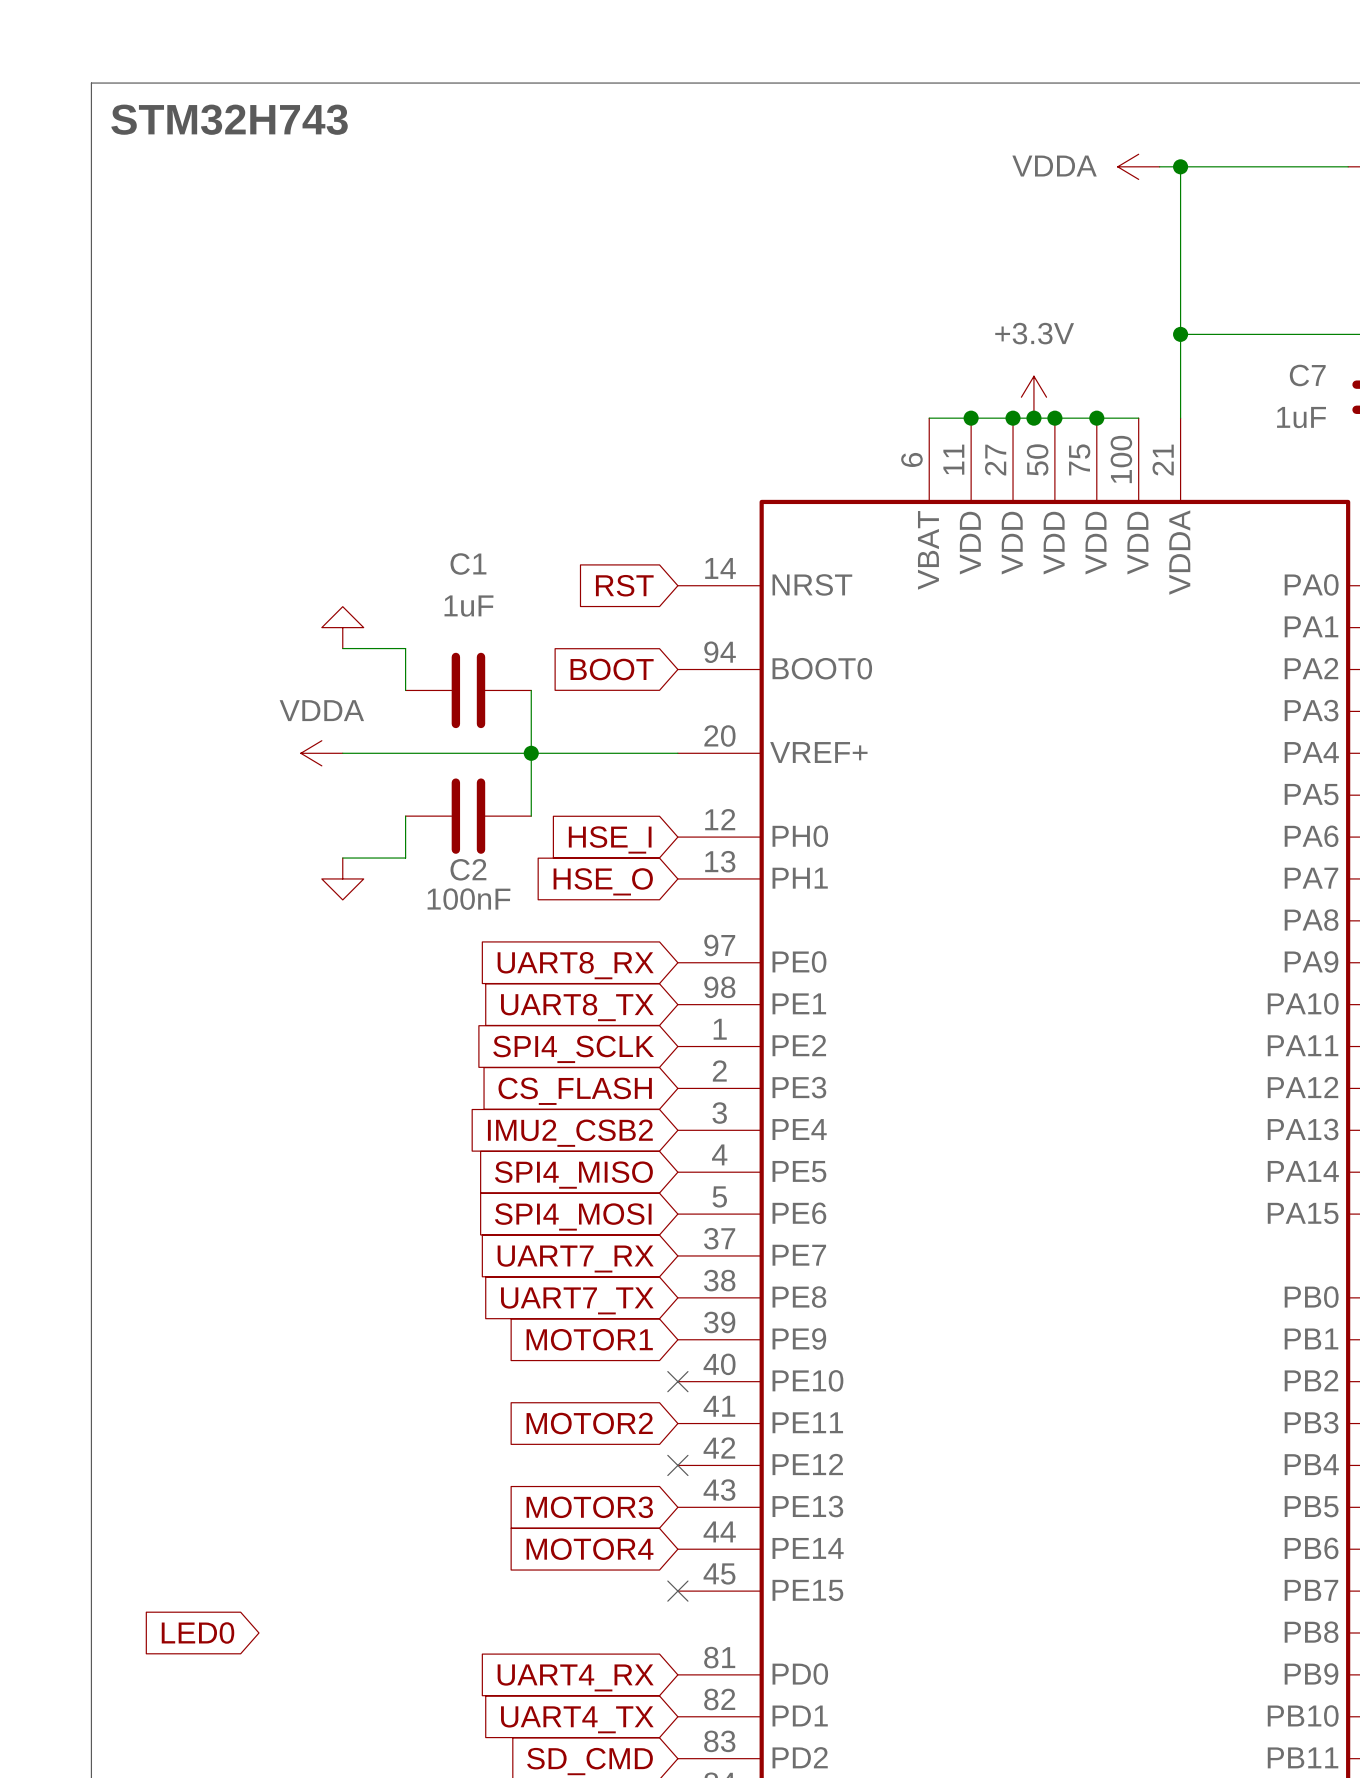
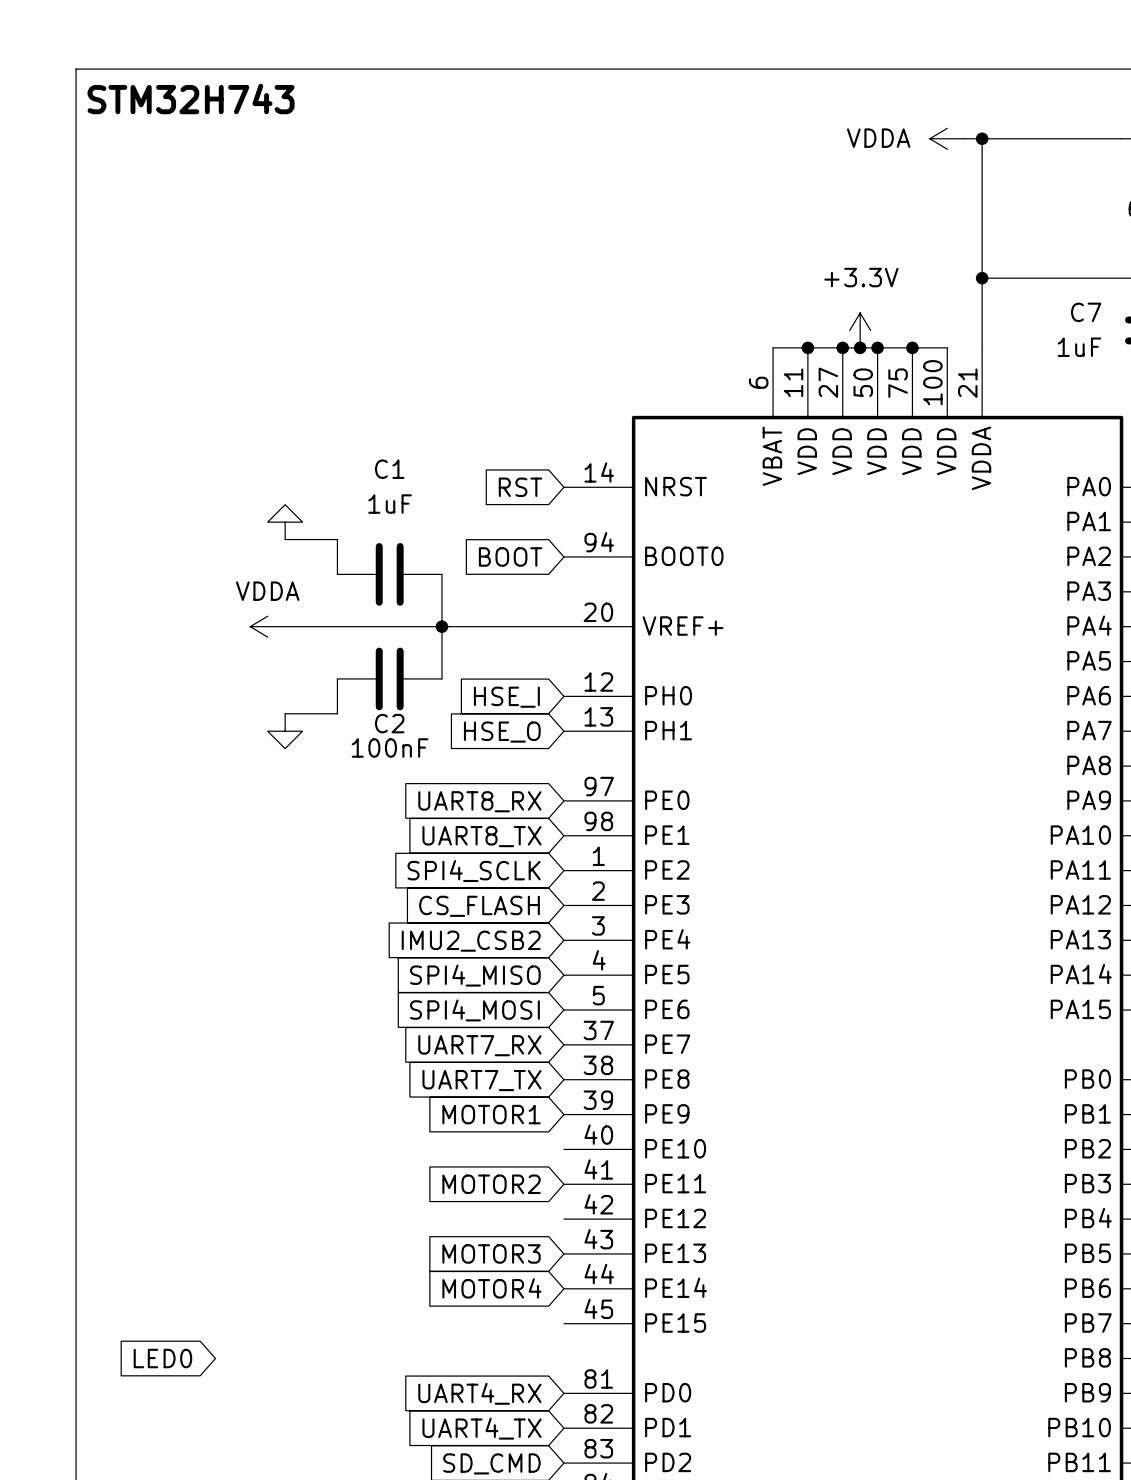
no-connect mark: (677, 1381) -> none
no-connect mark: (677, 1465) -> none
no-connect mark: (677, 1591) -> none

